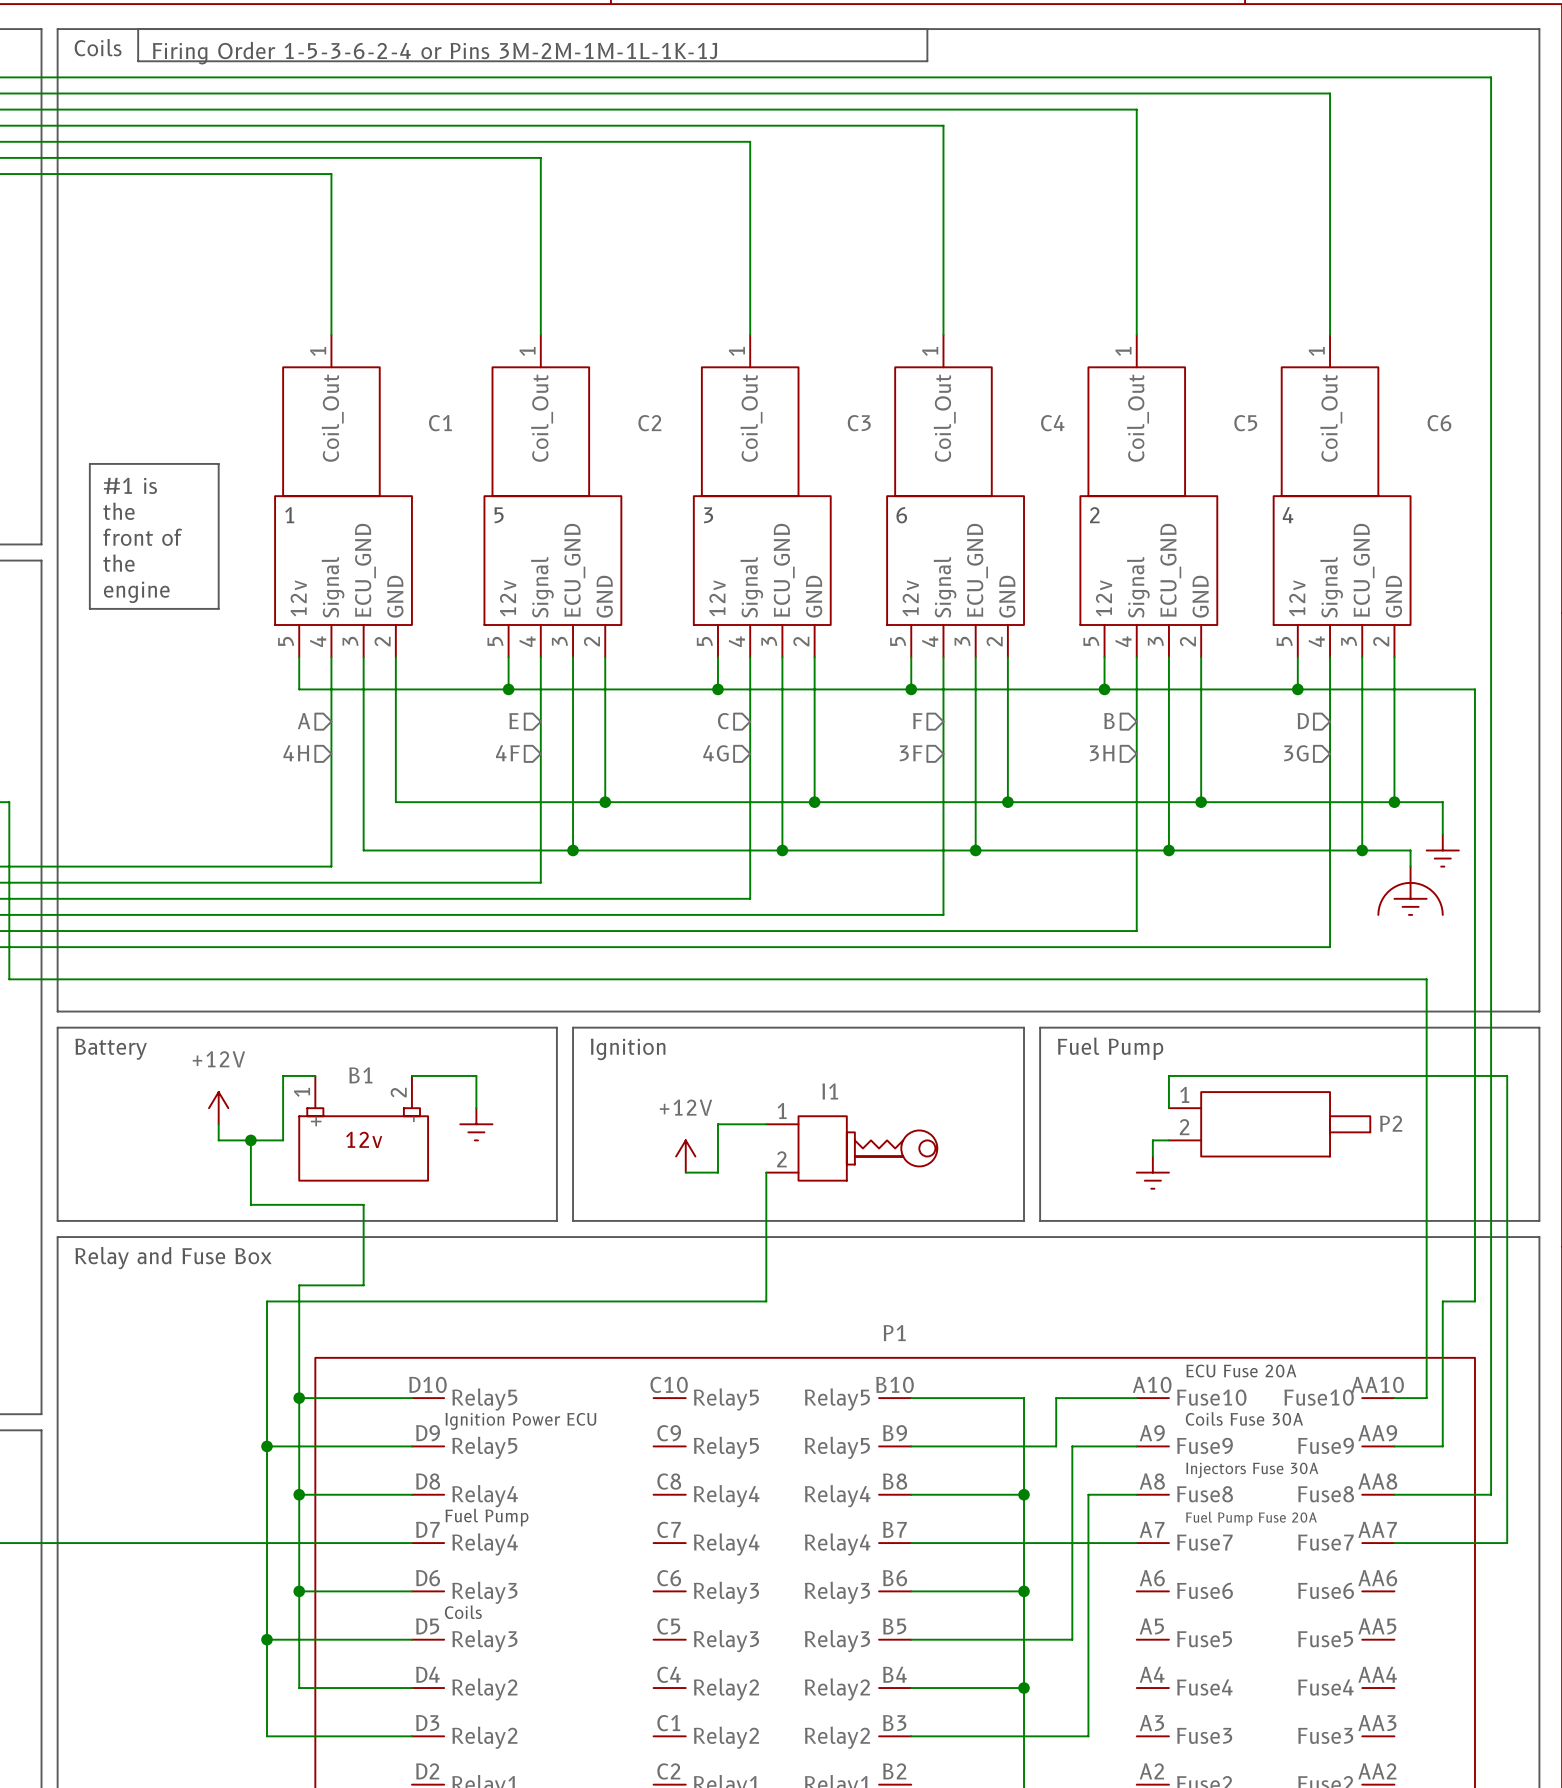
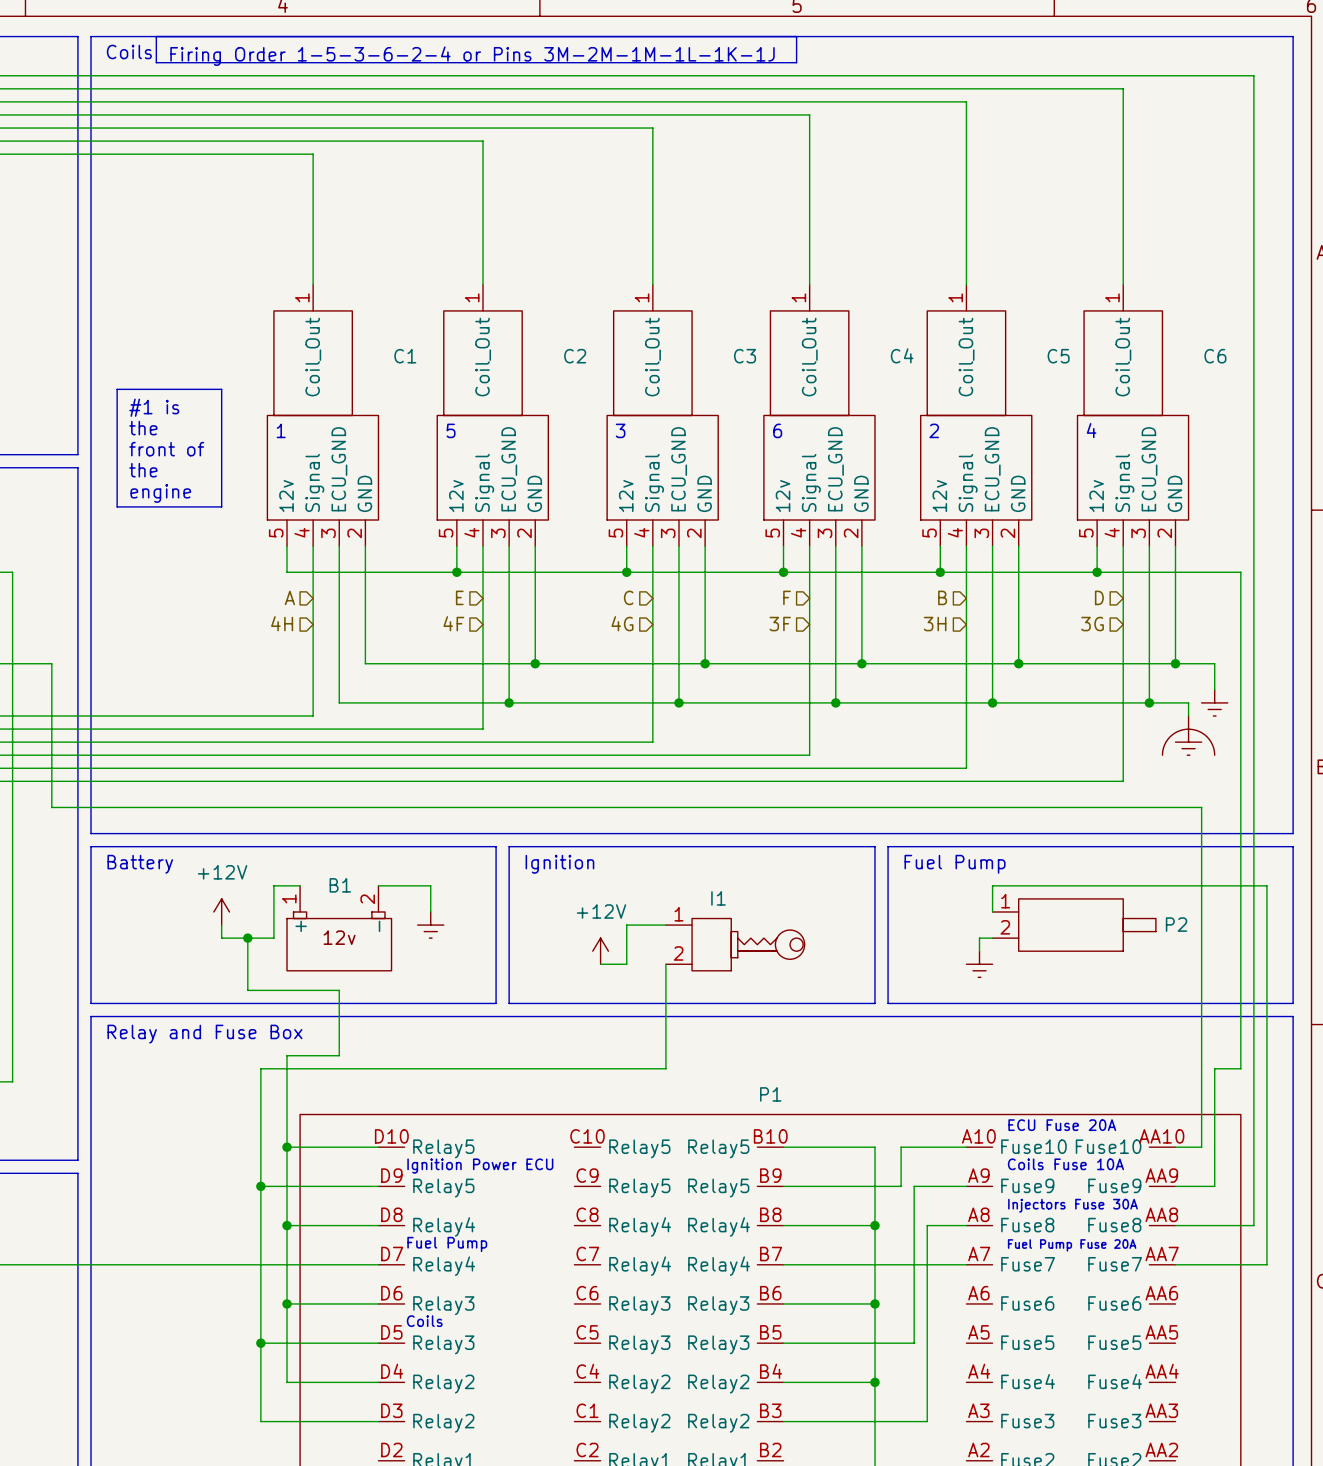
text: Coils Fuse 30A (1244, 1418) -> Coils Fuse 10A (1065, 1164)

